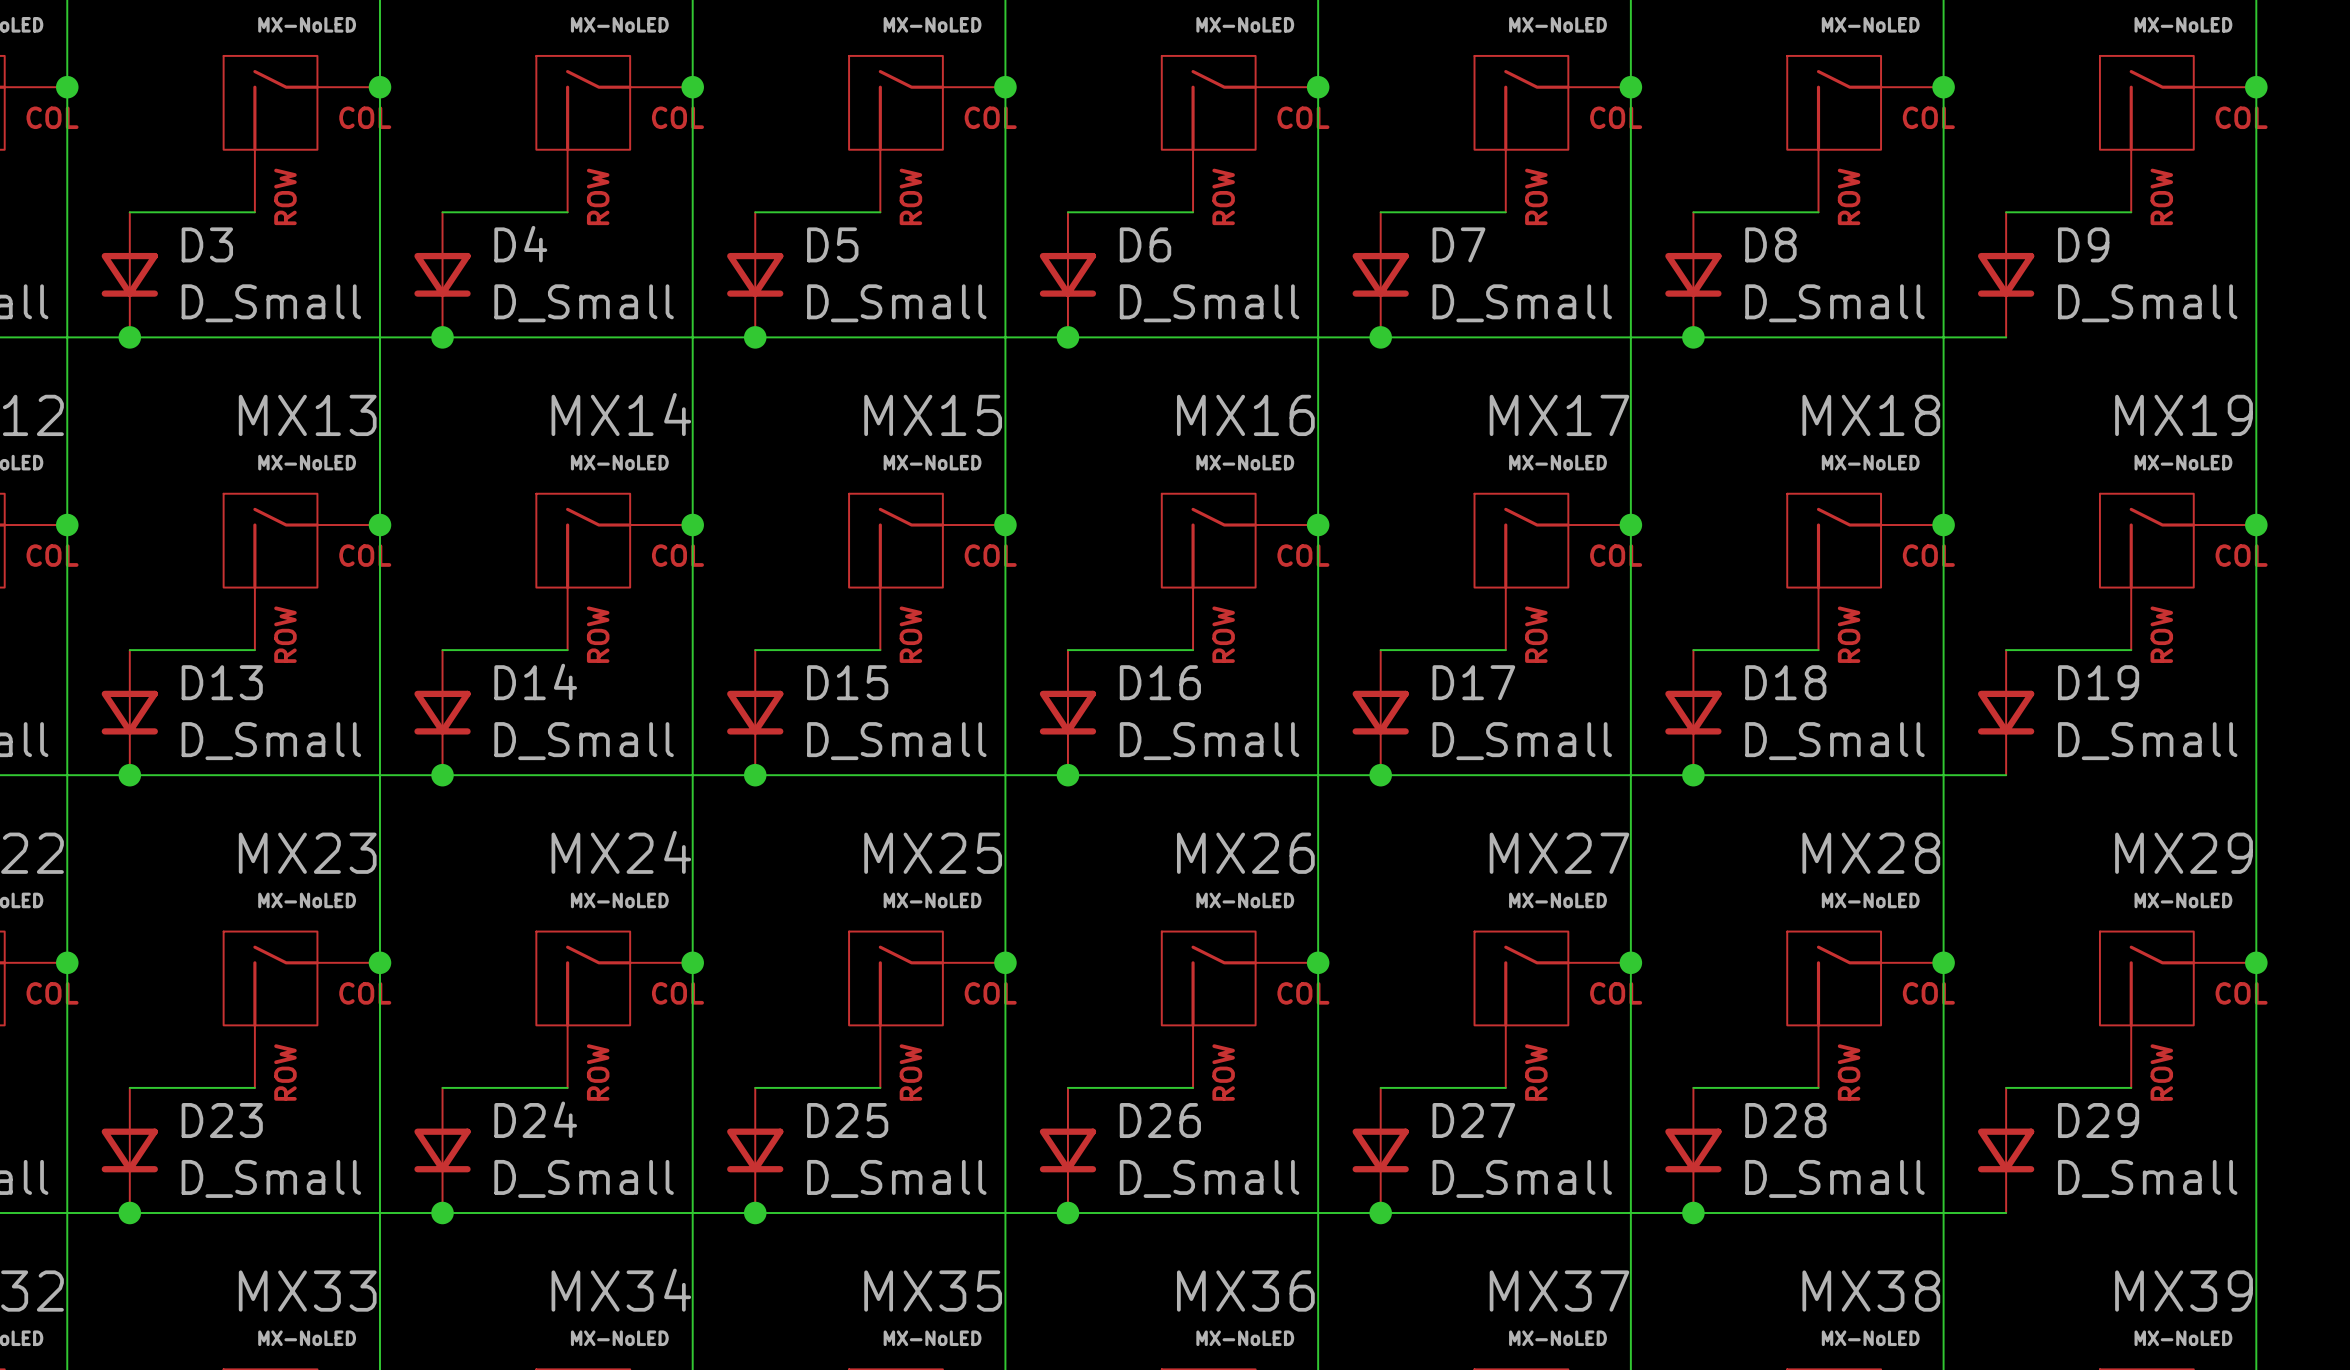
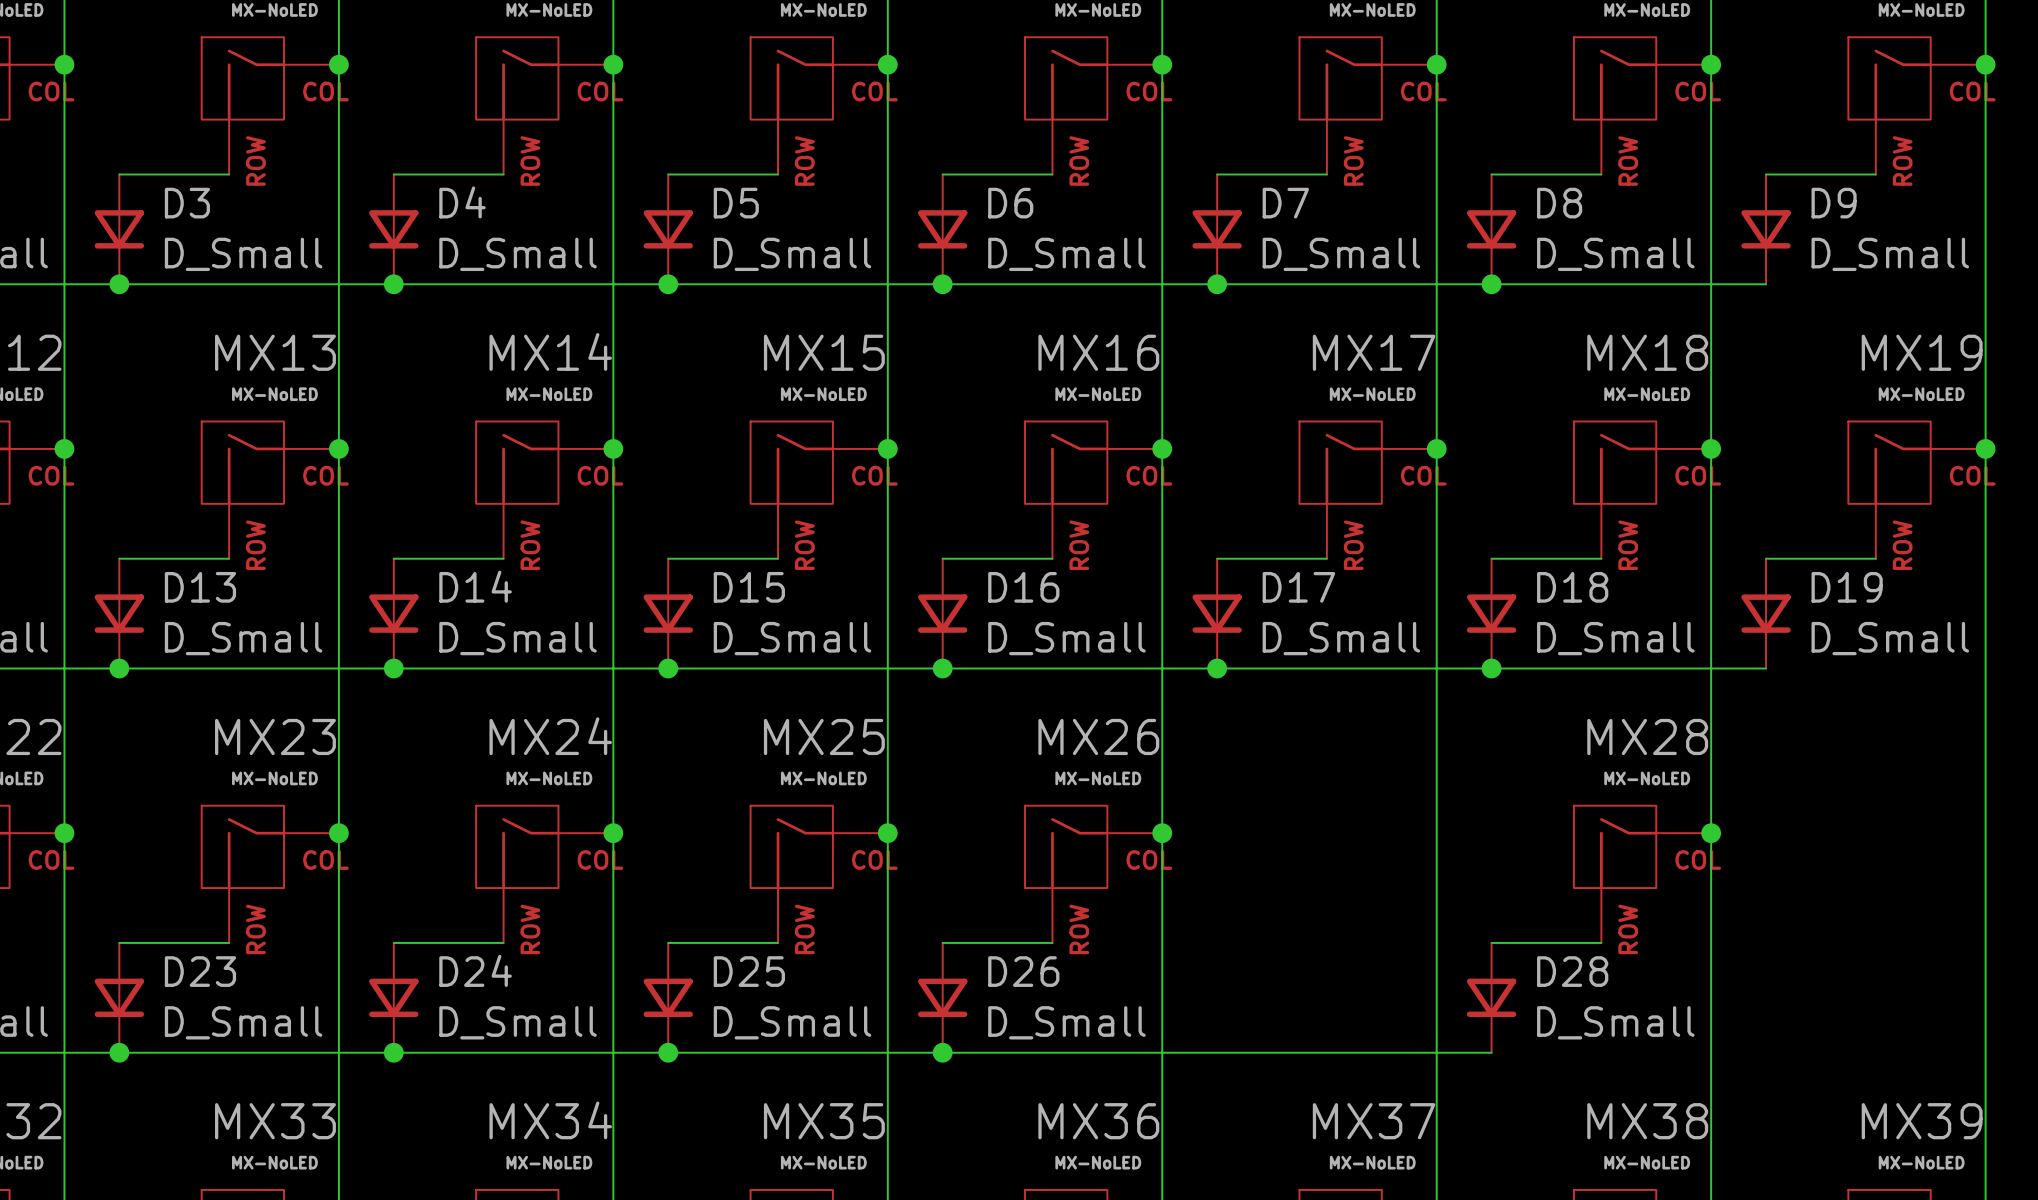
junction: (1630, 962) -> none
junction: (2256, 962) -> none
MX27: MX-NoLED (1552, 1009) -> none
MX29: MX-NoLED (2178, 1009) -> none
wire: (1380, 1087) (1505, 1087) -> none
wire: (2006, 1087) (2131, 1087) -> none
D27: D_Small (1380, 1150) -> none
D29: D_Small (2006, 1150) -> none
junction: (1380, 1213) -> none
wire: (1693, 1213) (2006, 1213) -> none
junction: (1693, 1213) -> none

